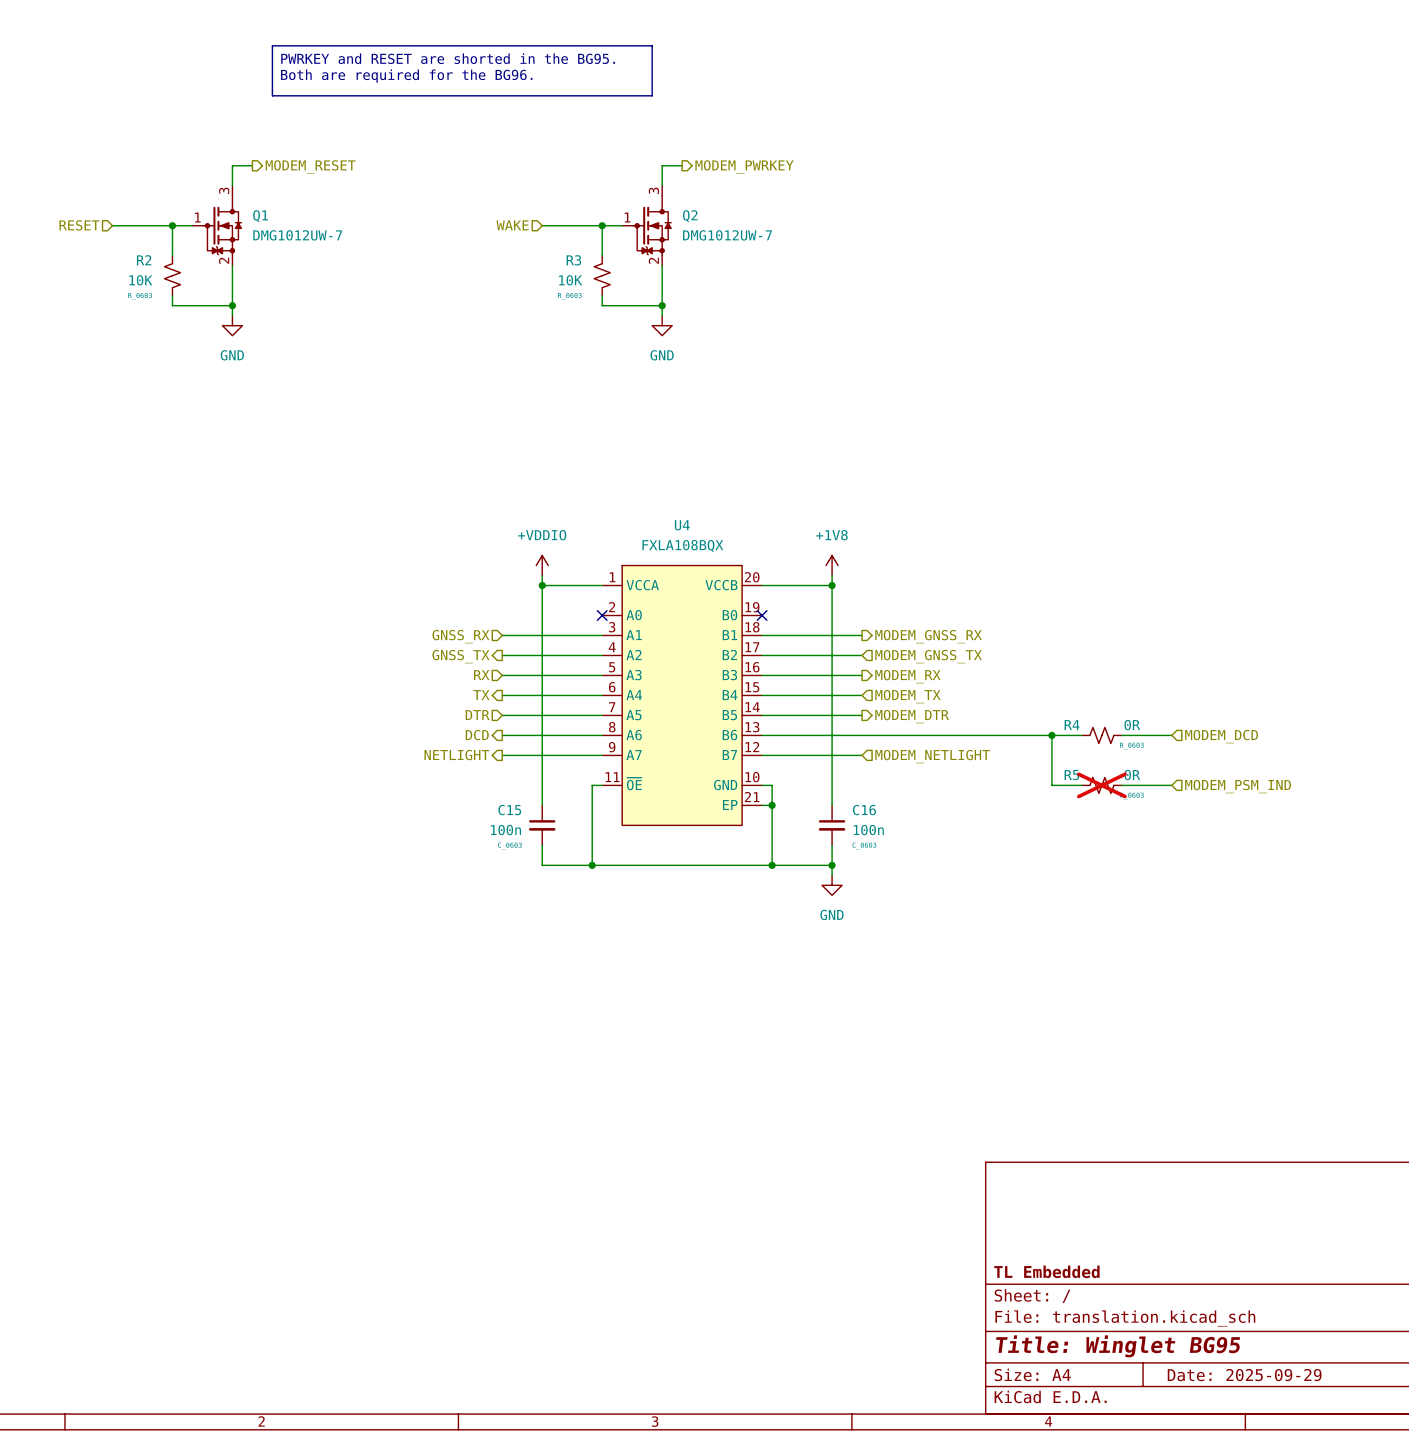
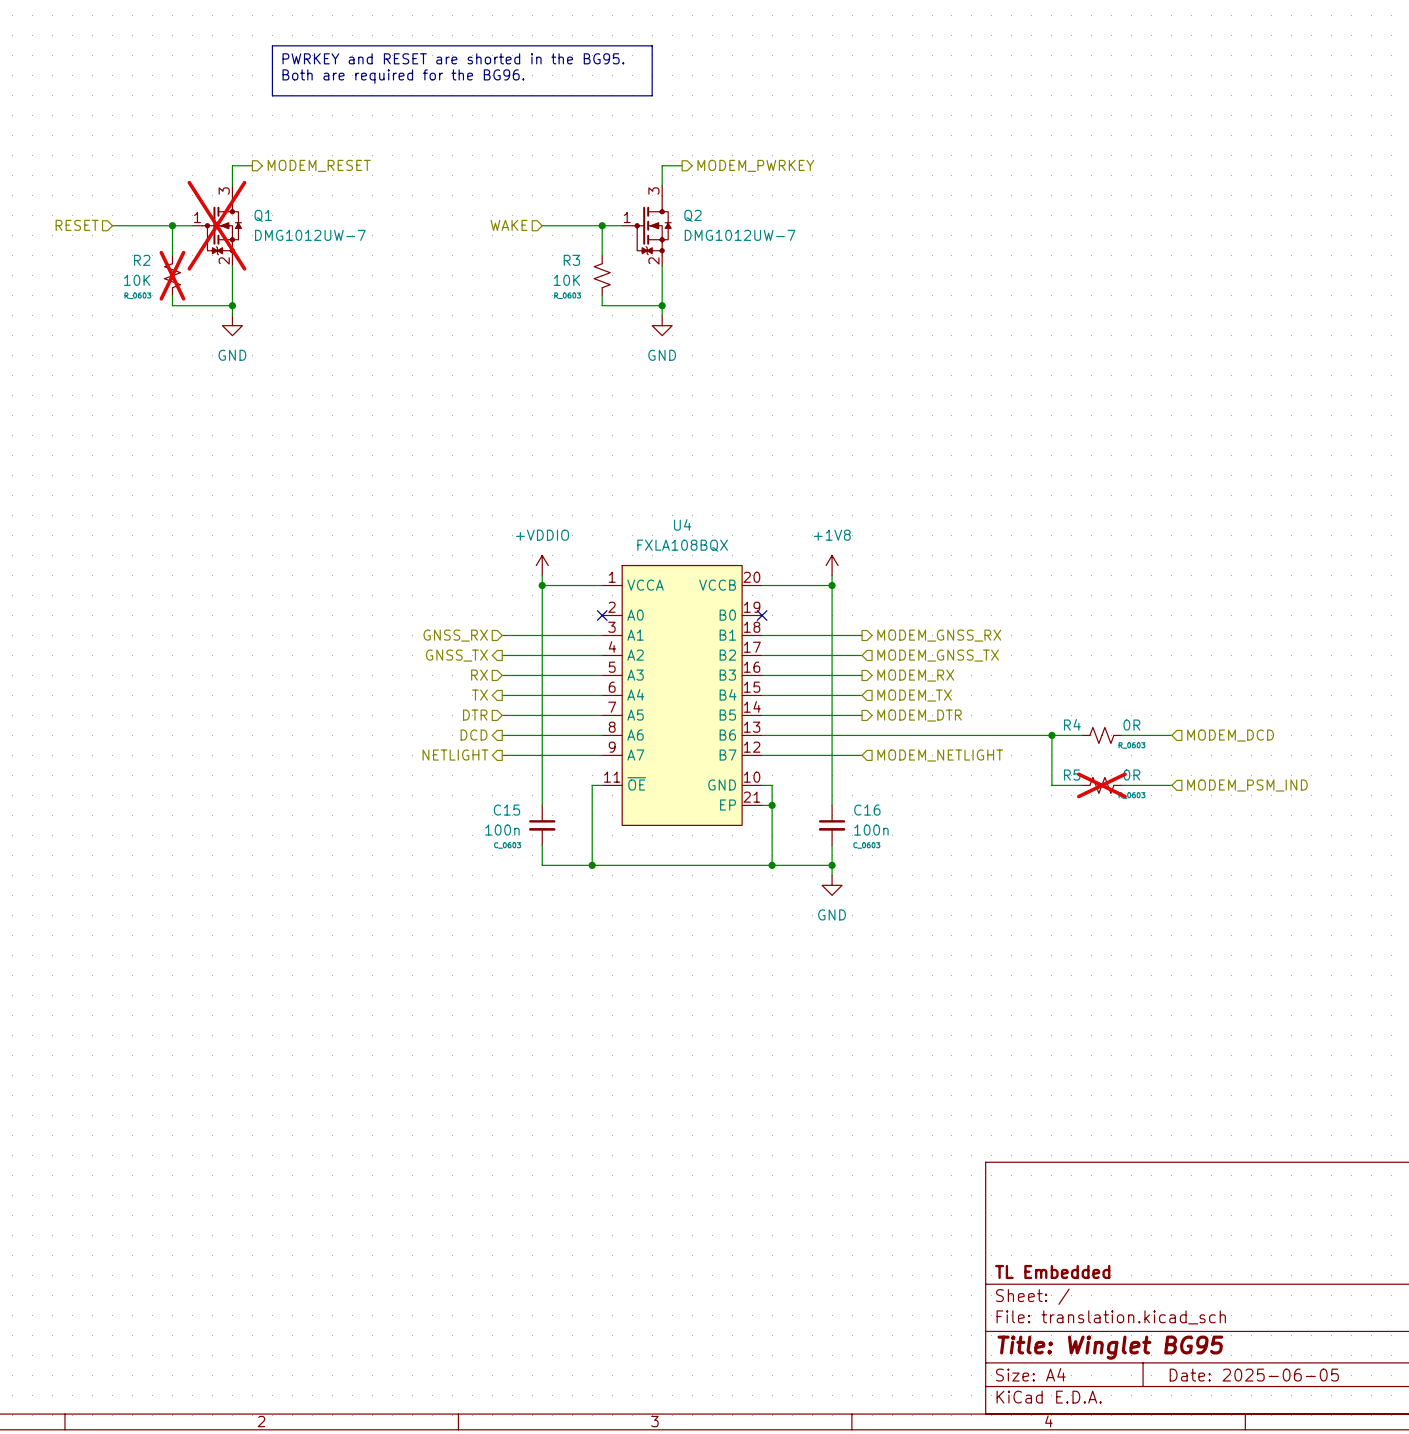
Q1 do-not-place cross: none -> (216, 225)
R2 do-not-place cross: none -> (172, 275)
title block: Date: 2025-09-29 (1244, 1375) -> Date: 2025-06-05 (1254, 1375)

